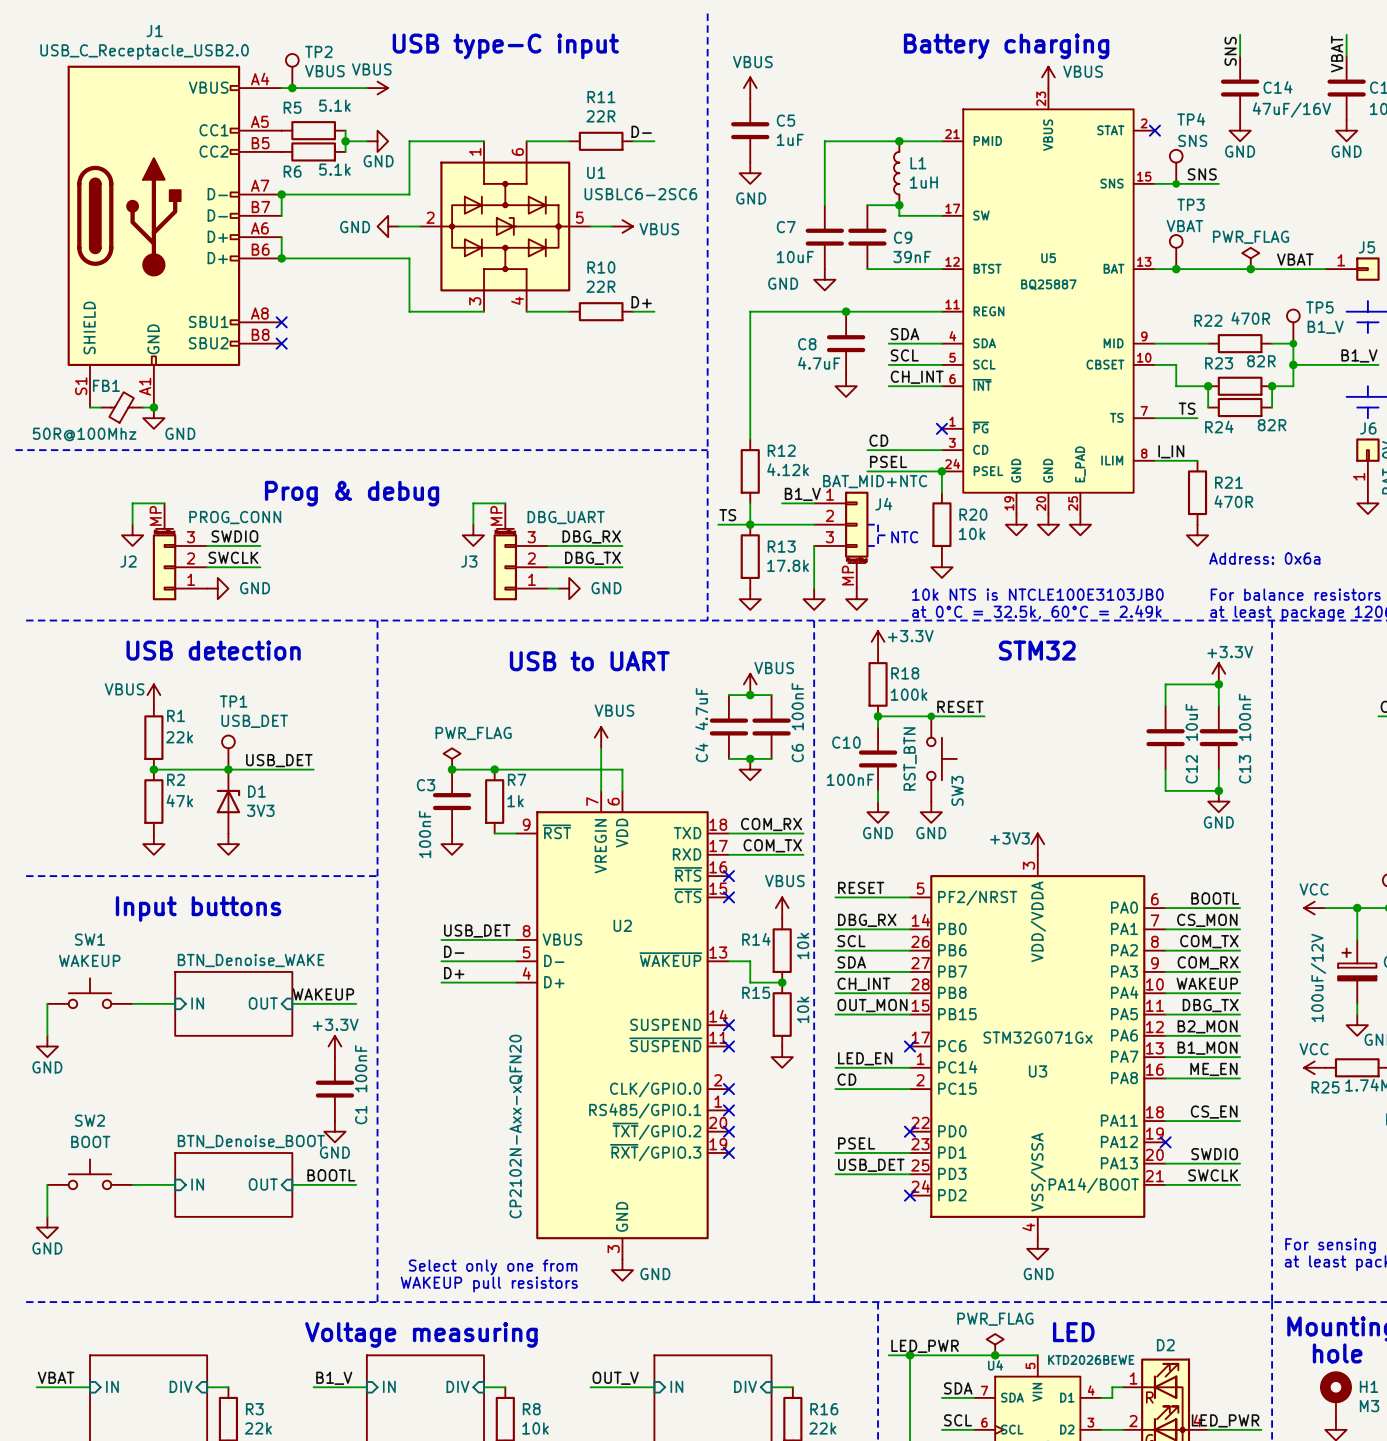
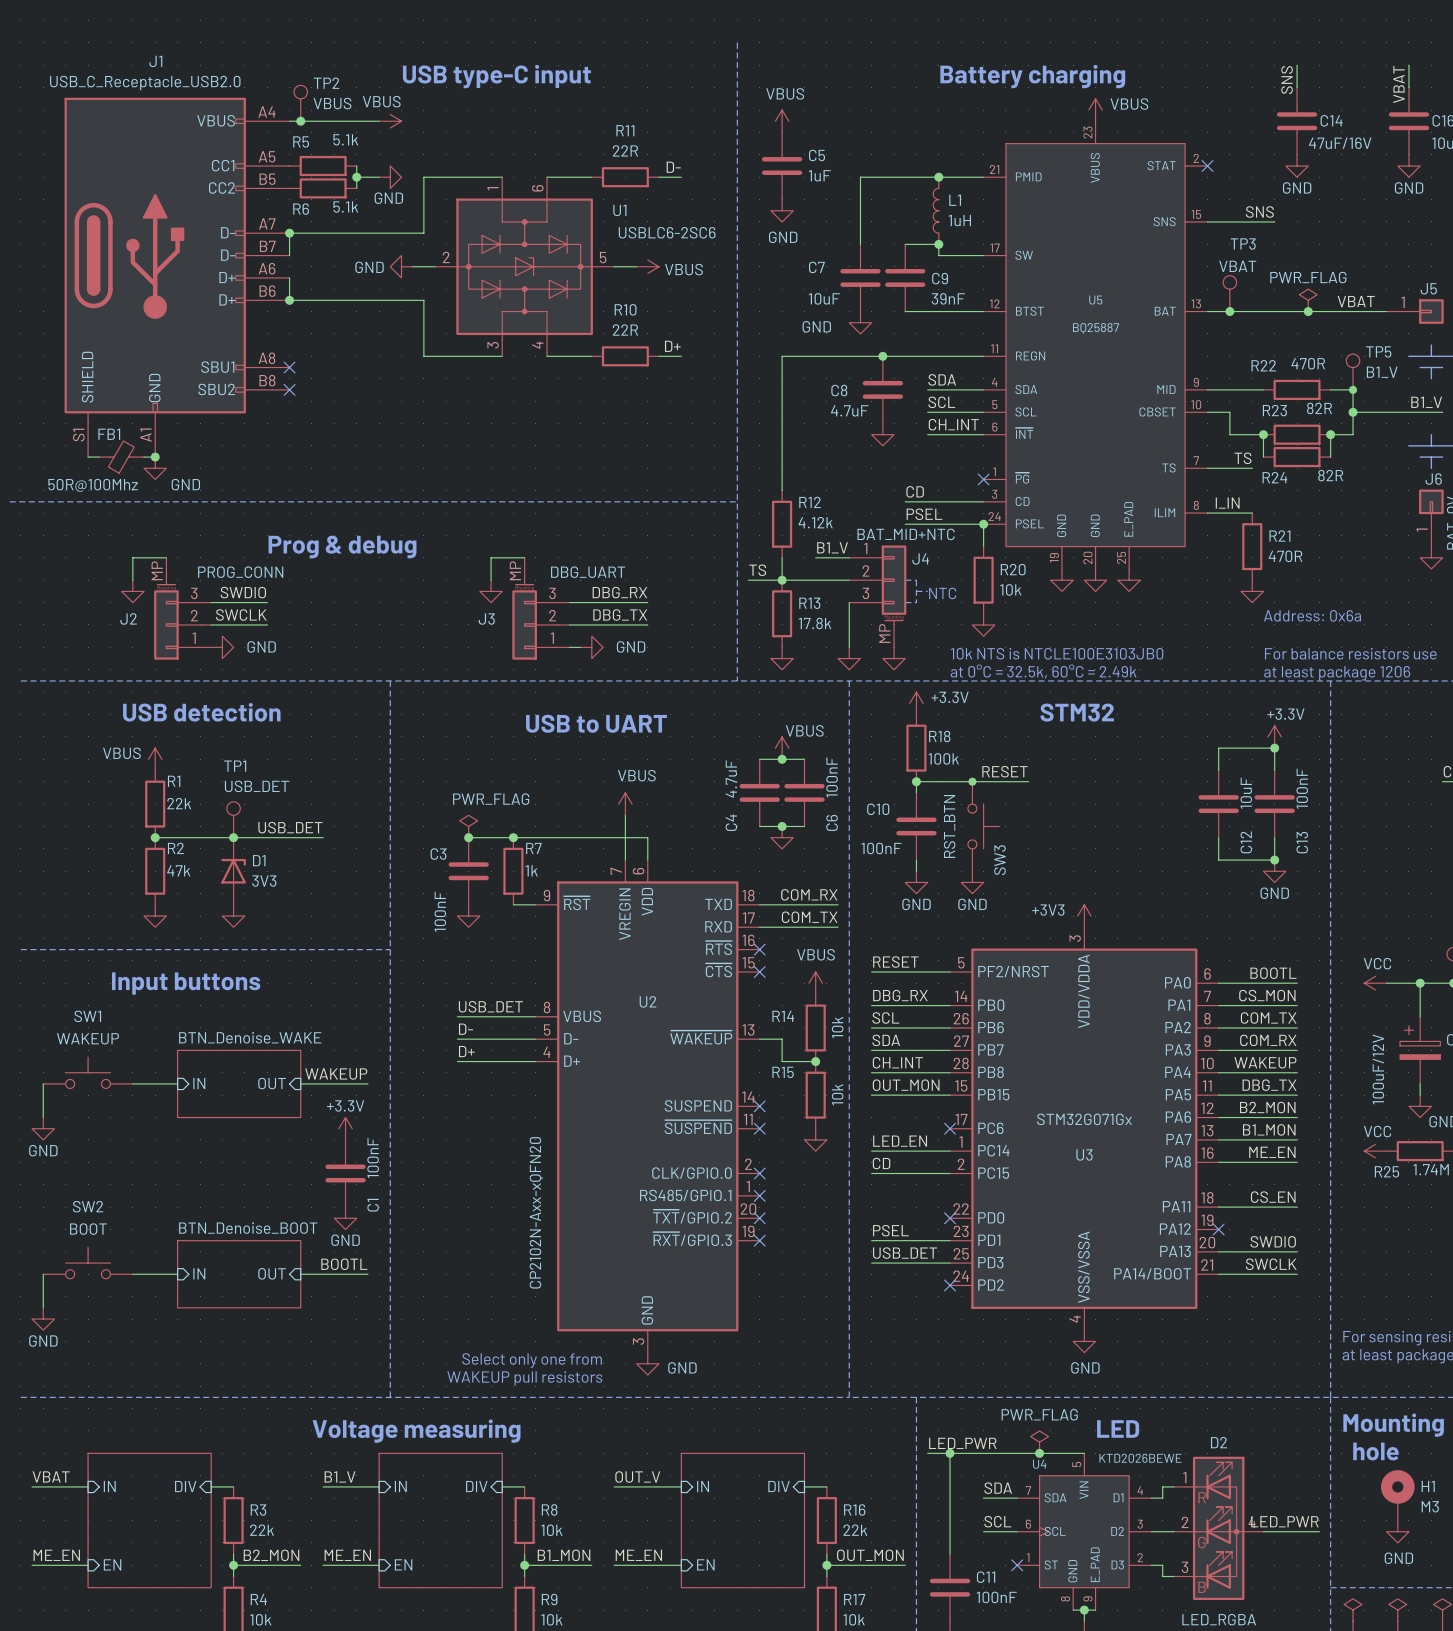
TP4: SNS (1176, 166) -> none
junction: (1176, 183) -> none

